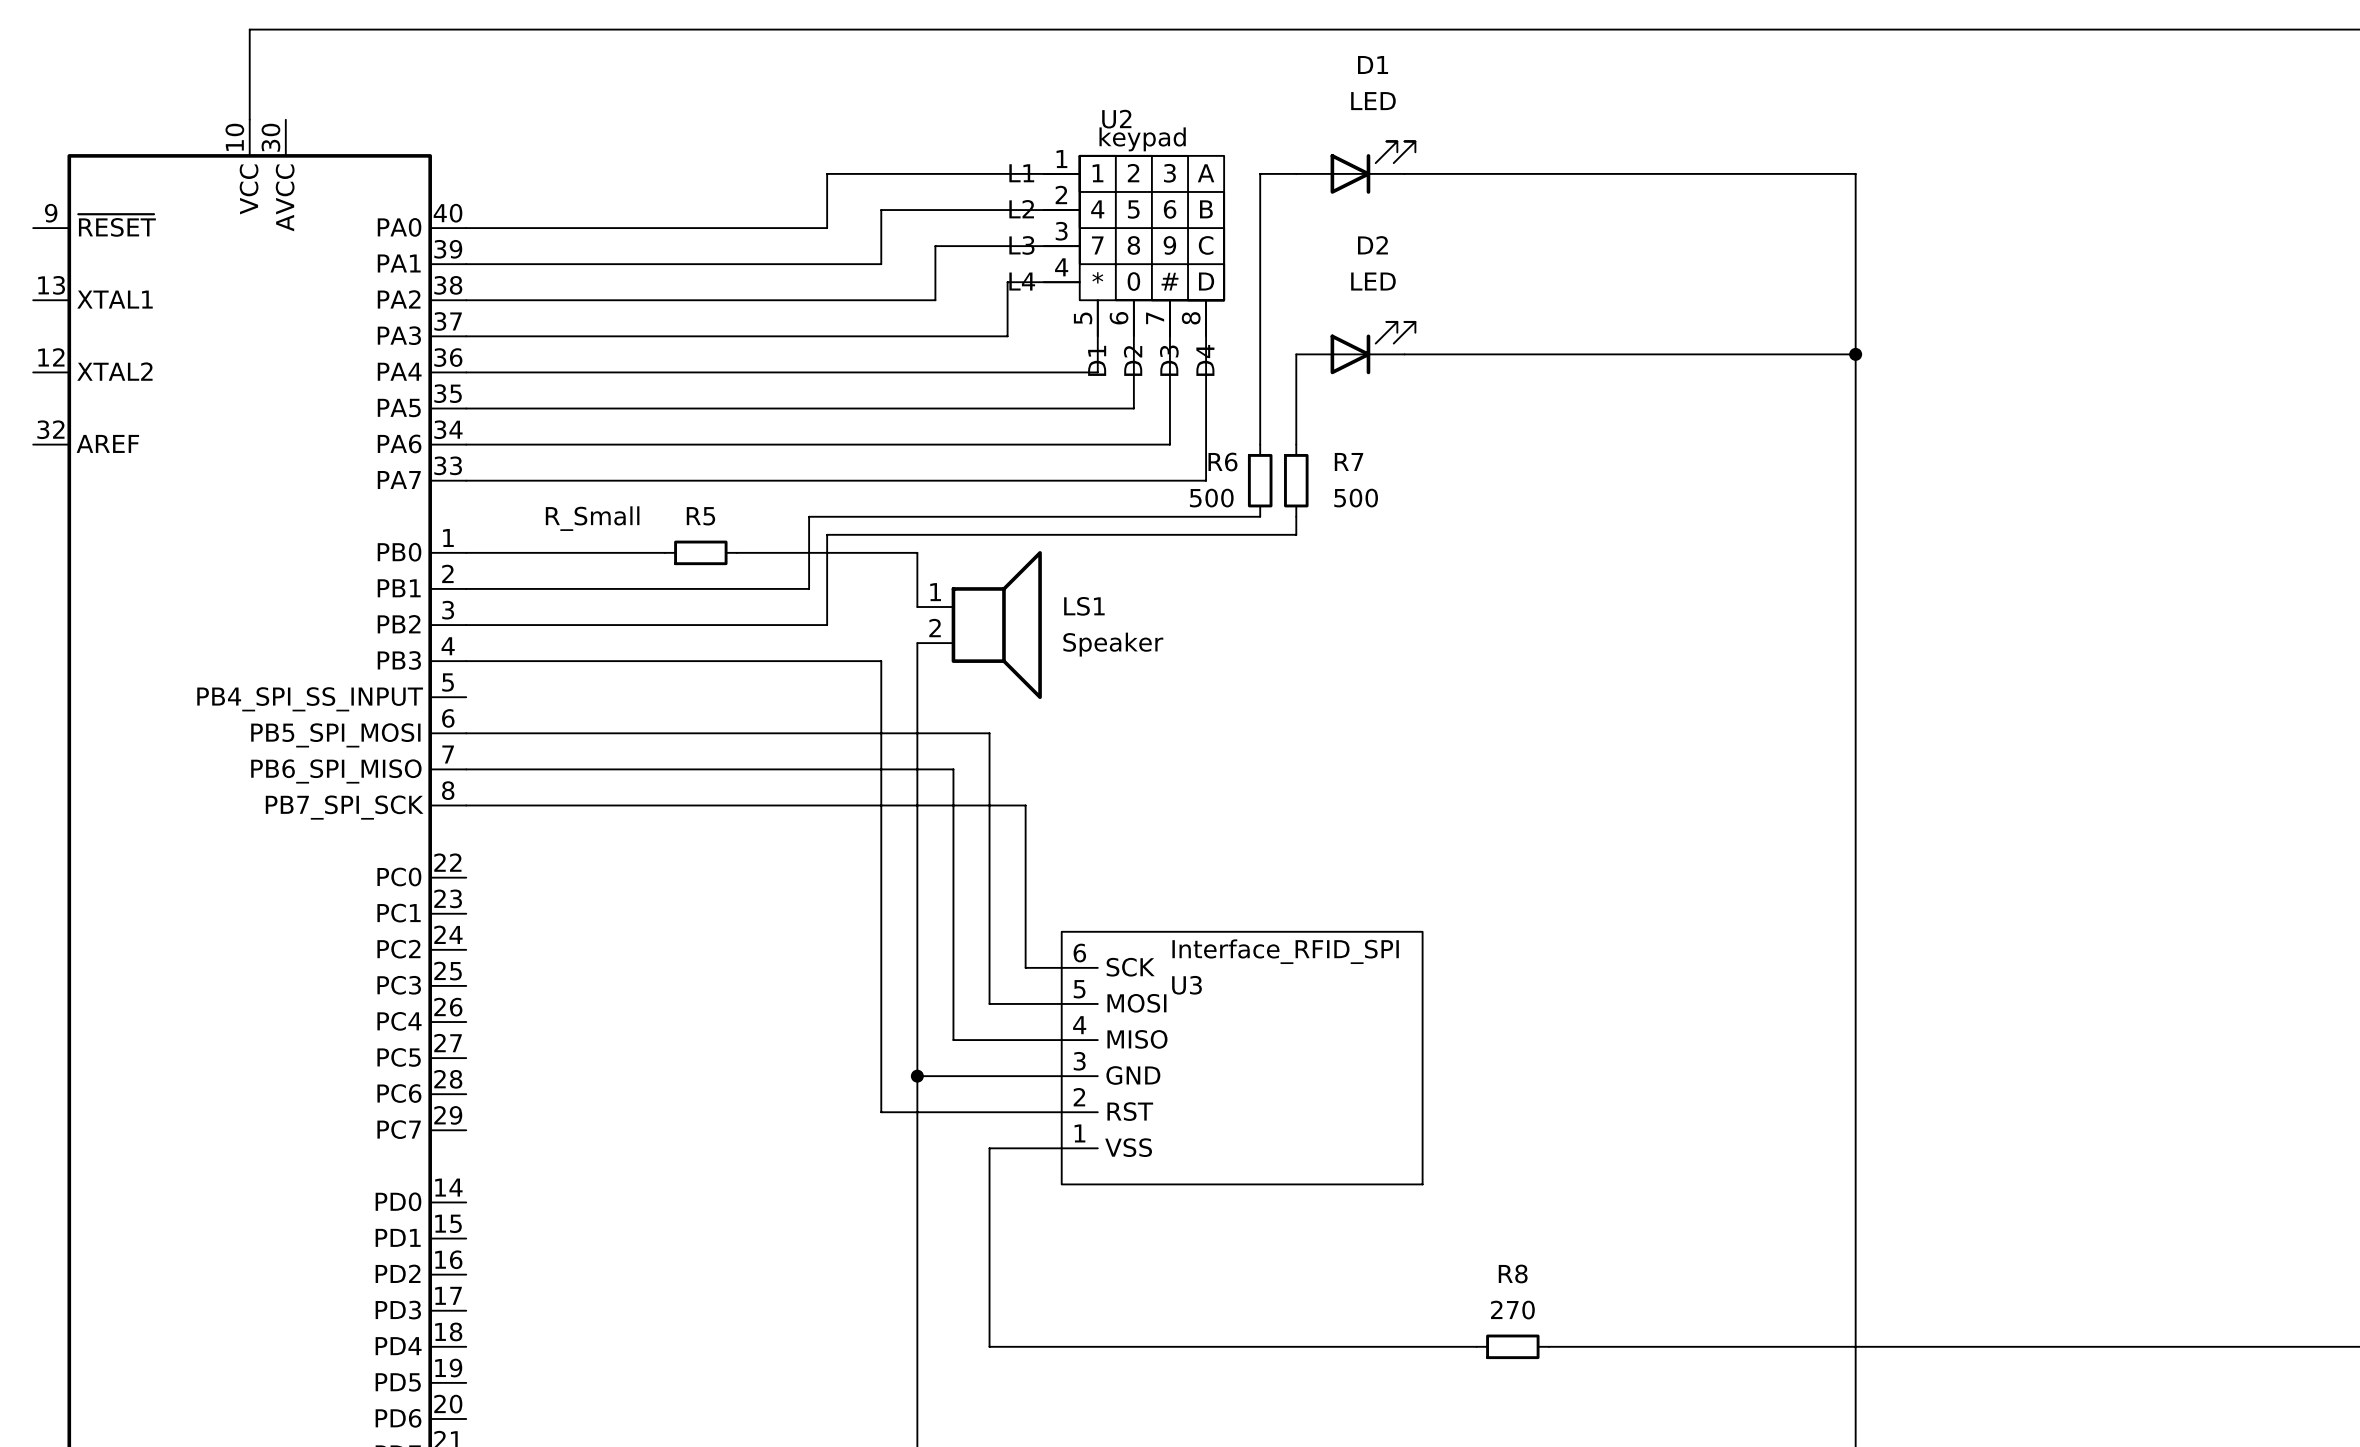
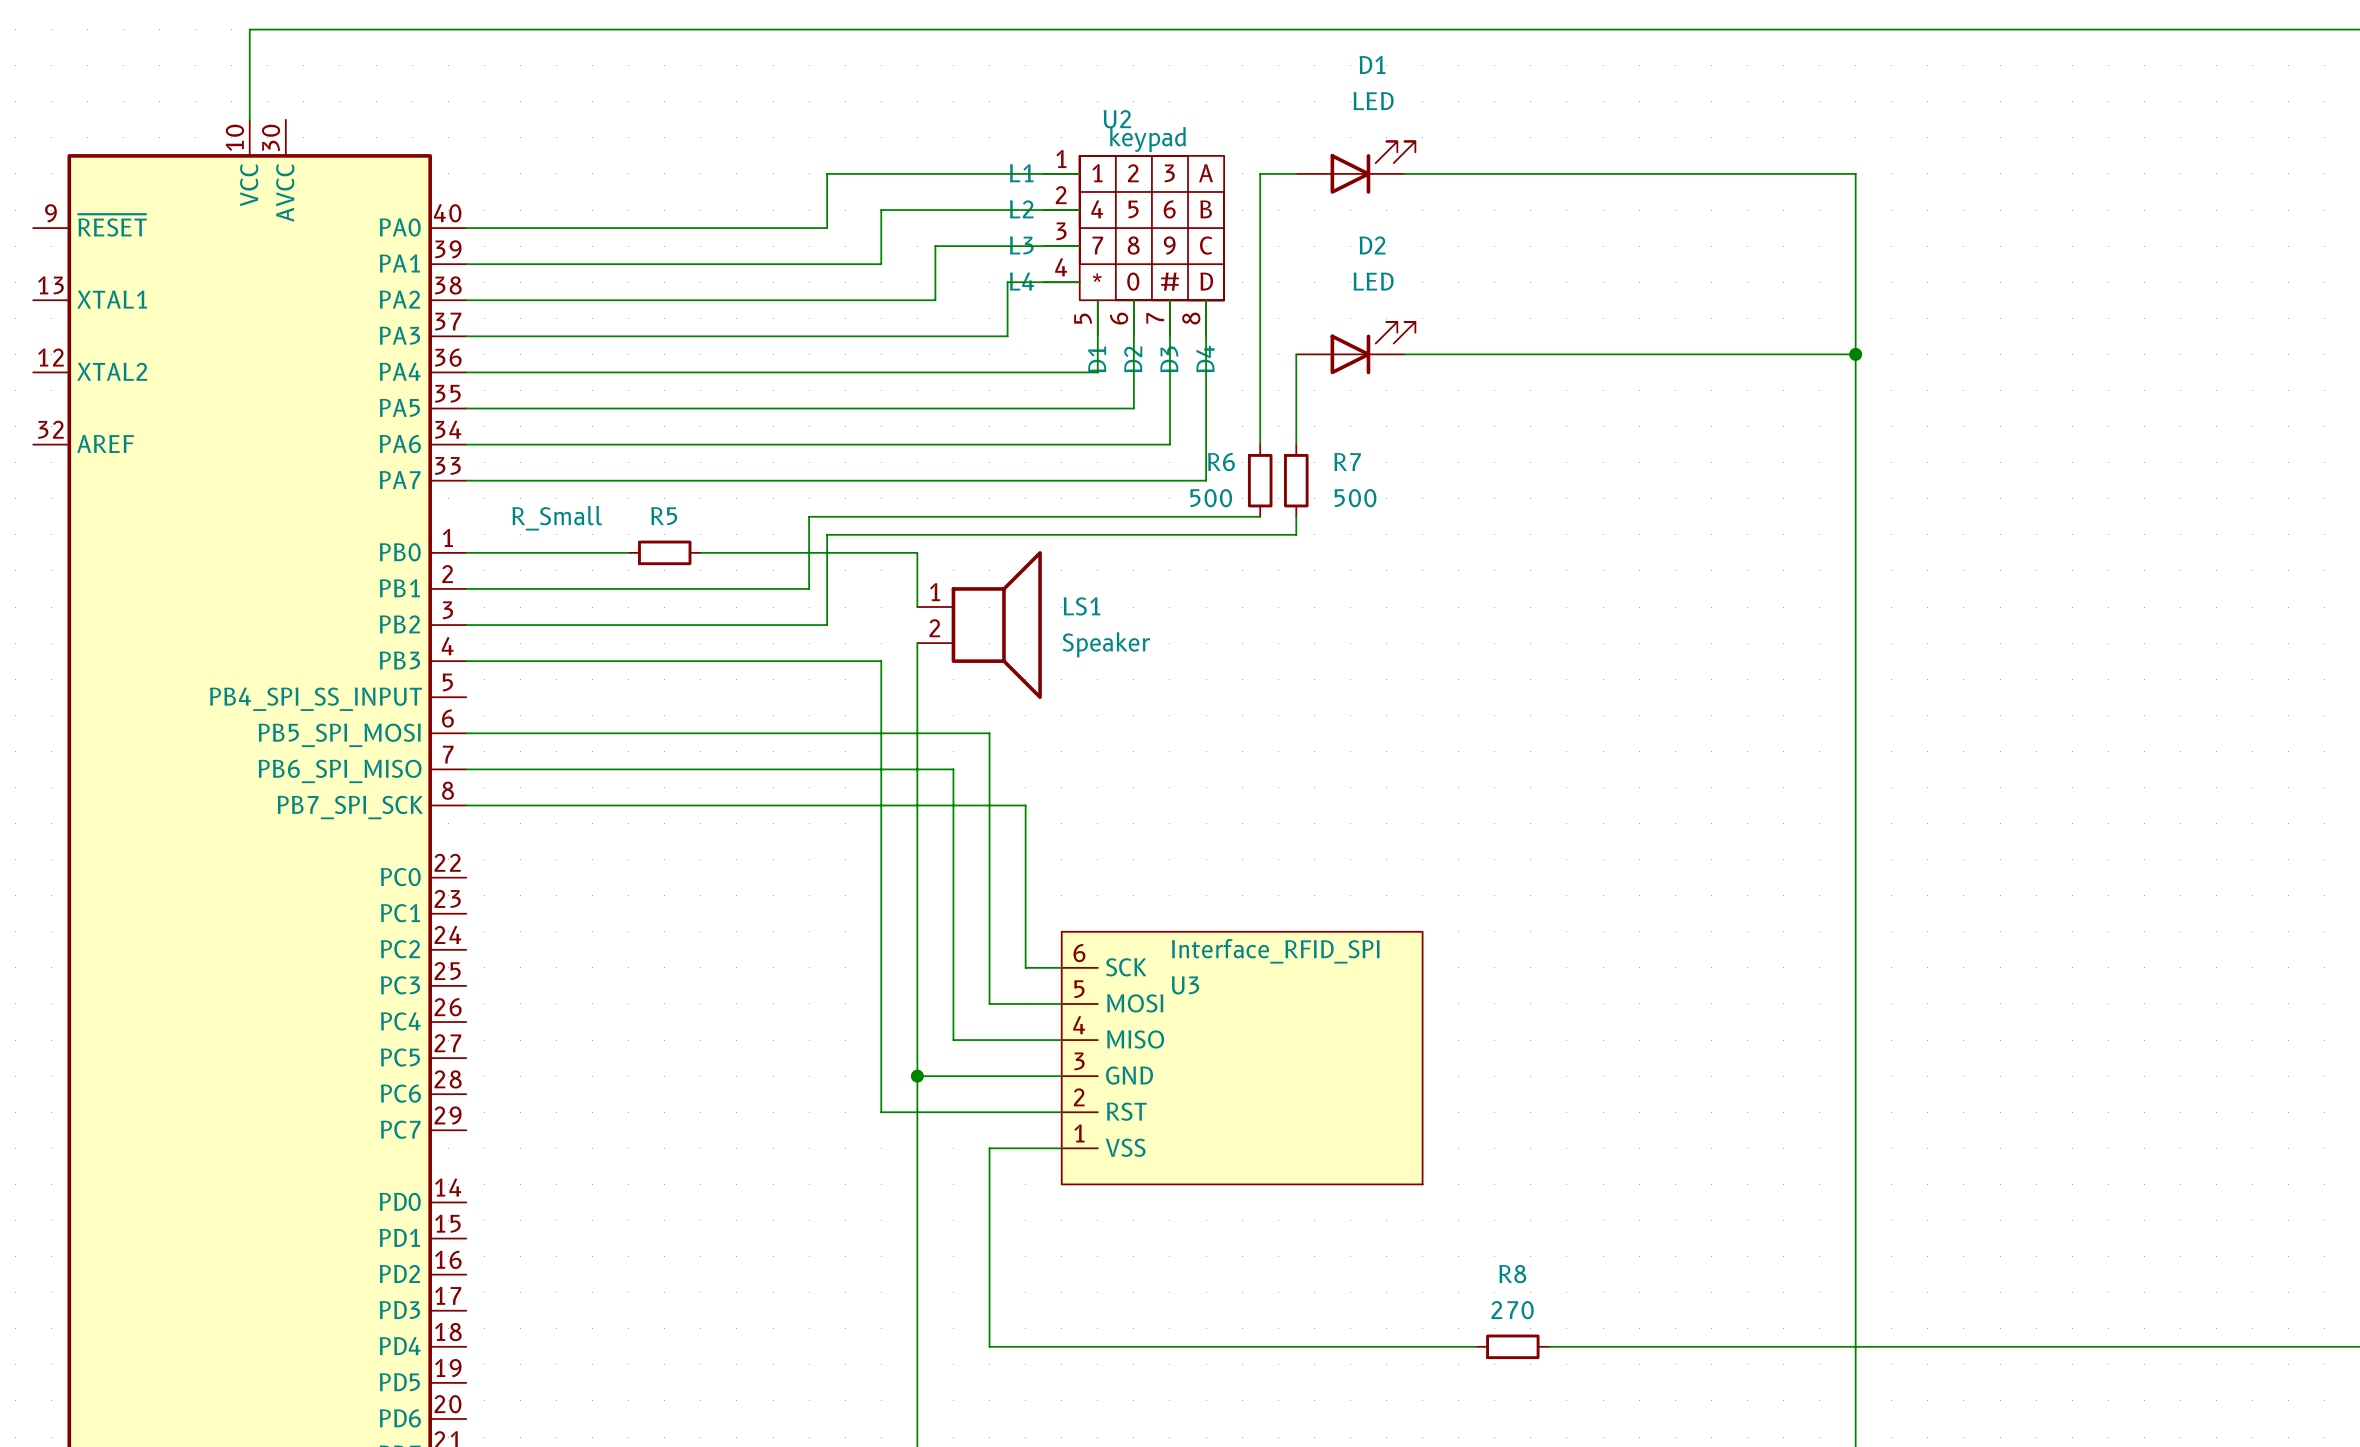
wire: (628, 552) (664, 552) -> (700, 552) (736, 552)
R5 position: (700, 552) -> (664, 552)

